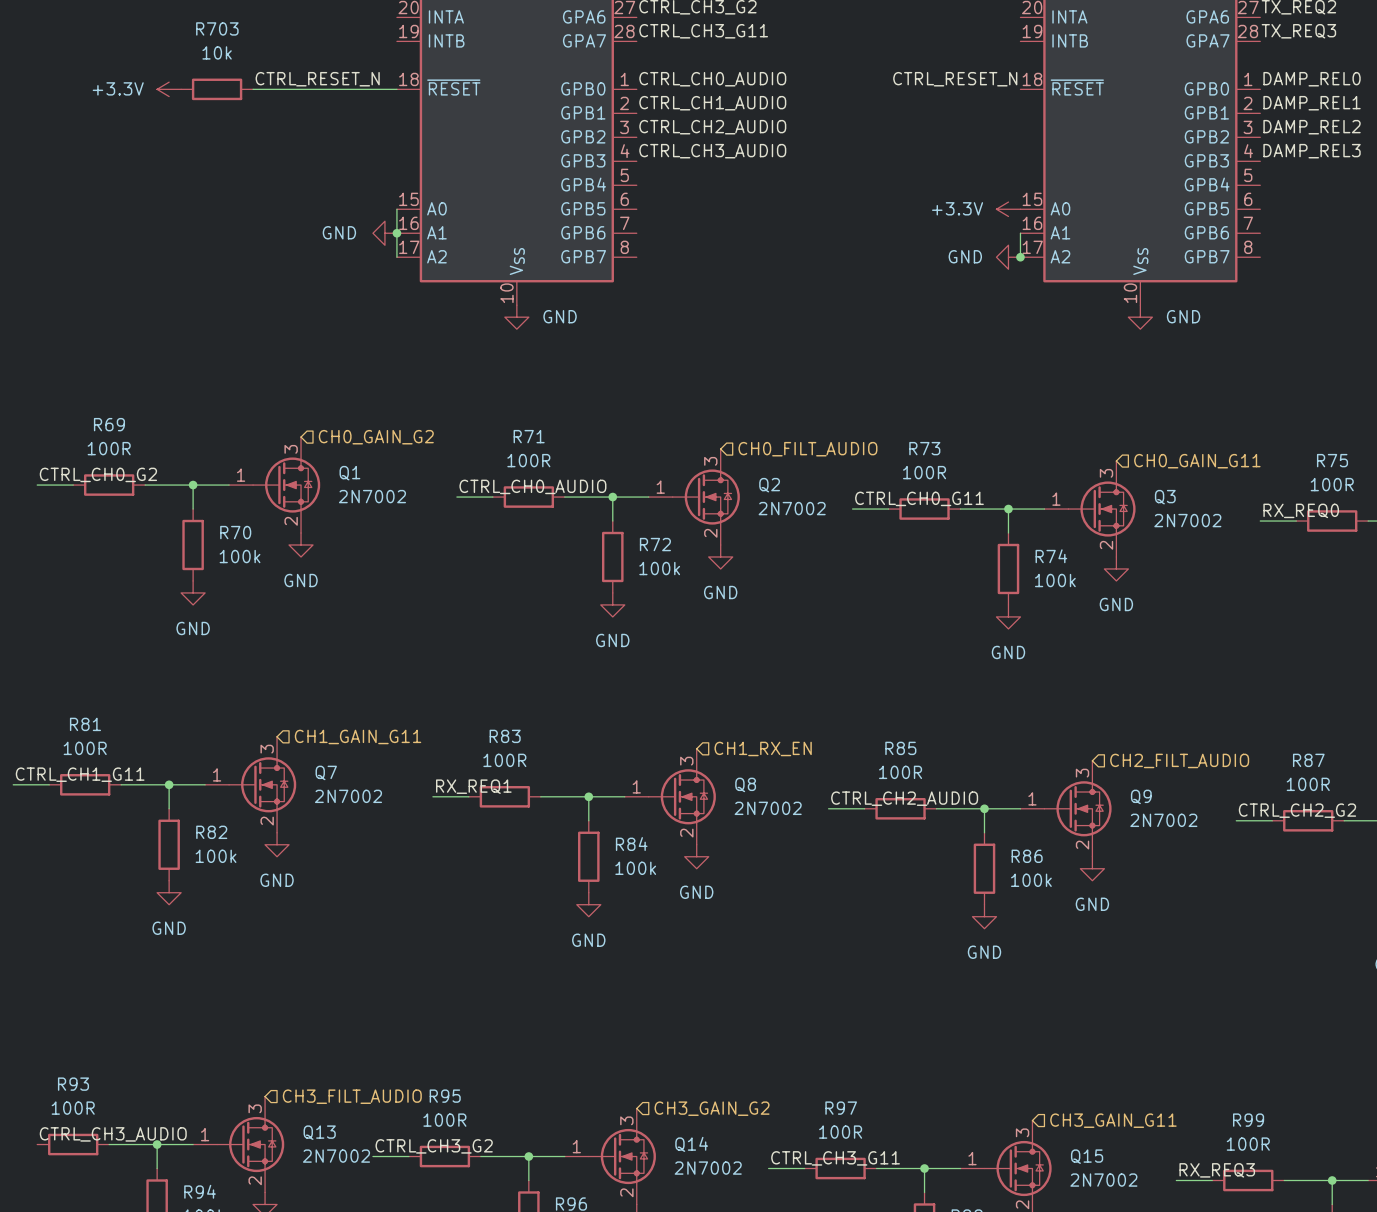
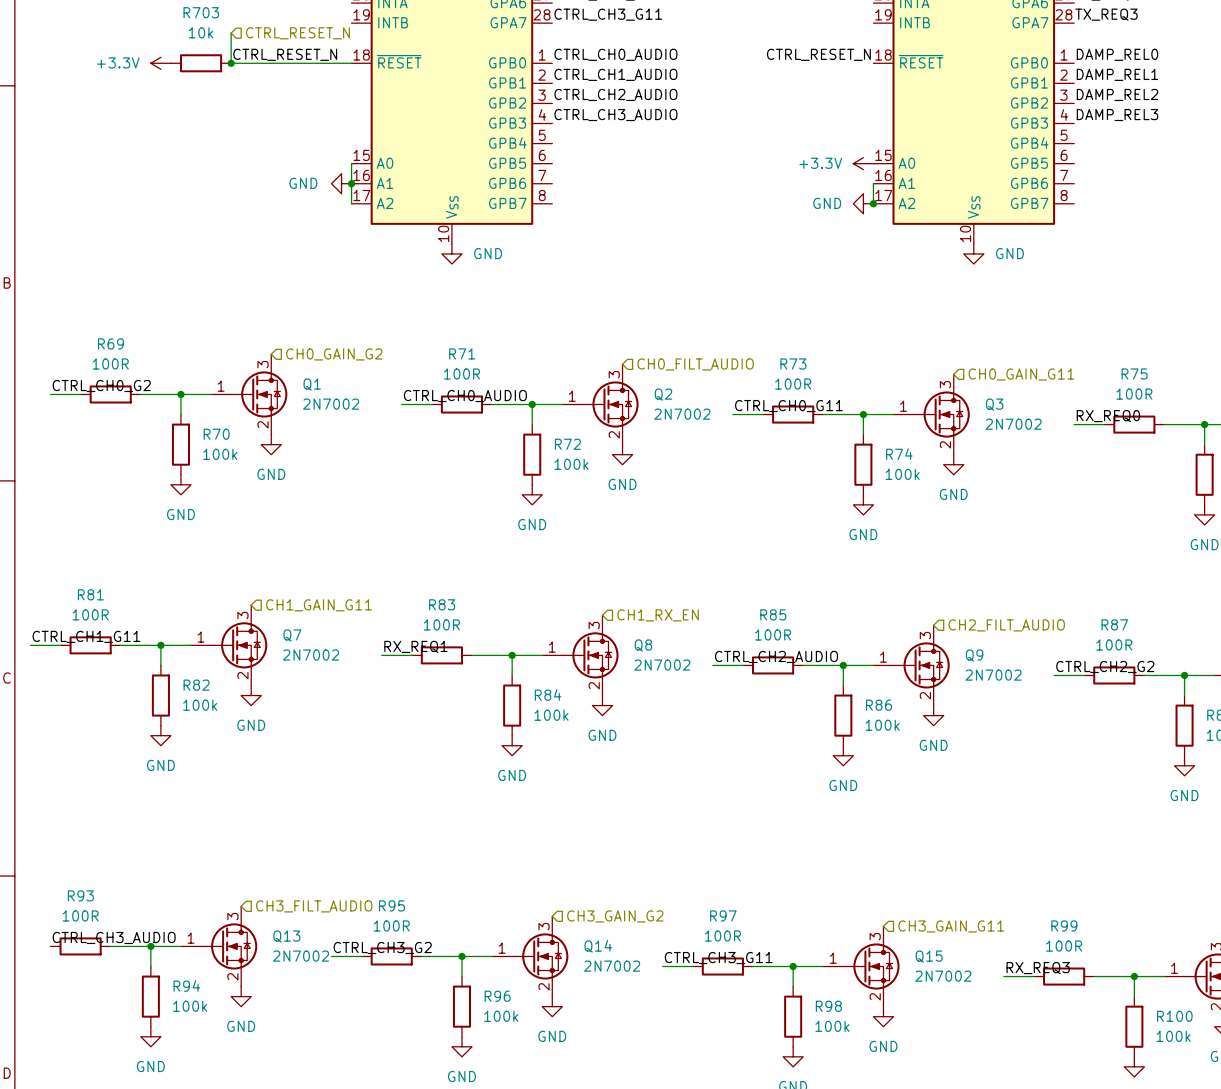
wire: none -> (231, 33) (231, 63)
hierarchical label: none -> CTRL_RESET_N (297, 33)
junction: none -> (231, 63)

